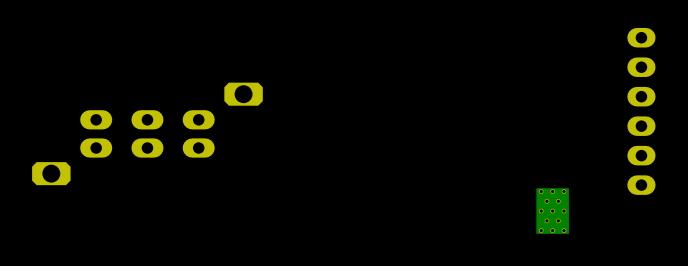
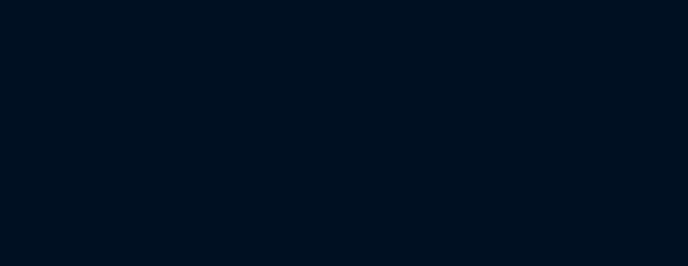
part: (641, 111) -> none
part: (147, 133) -> none
part: (552, 211) -> none

